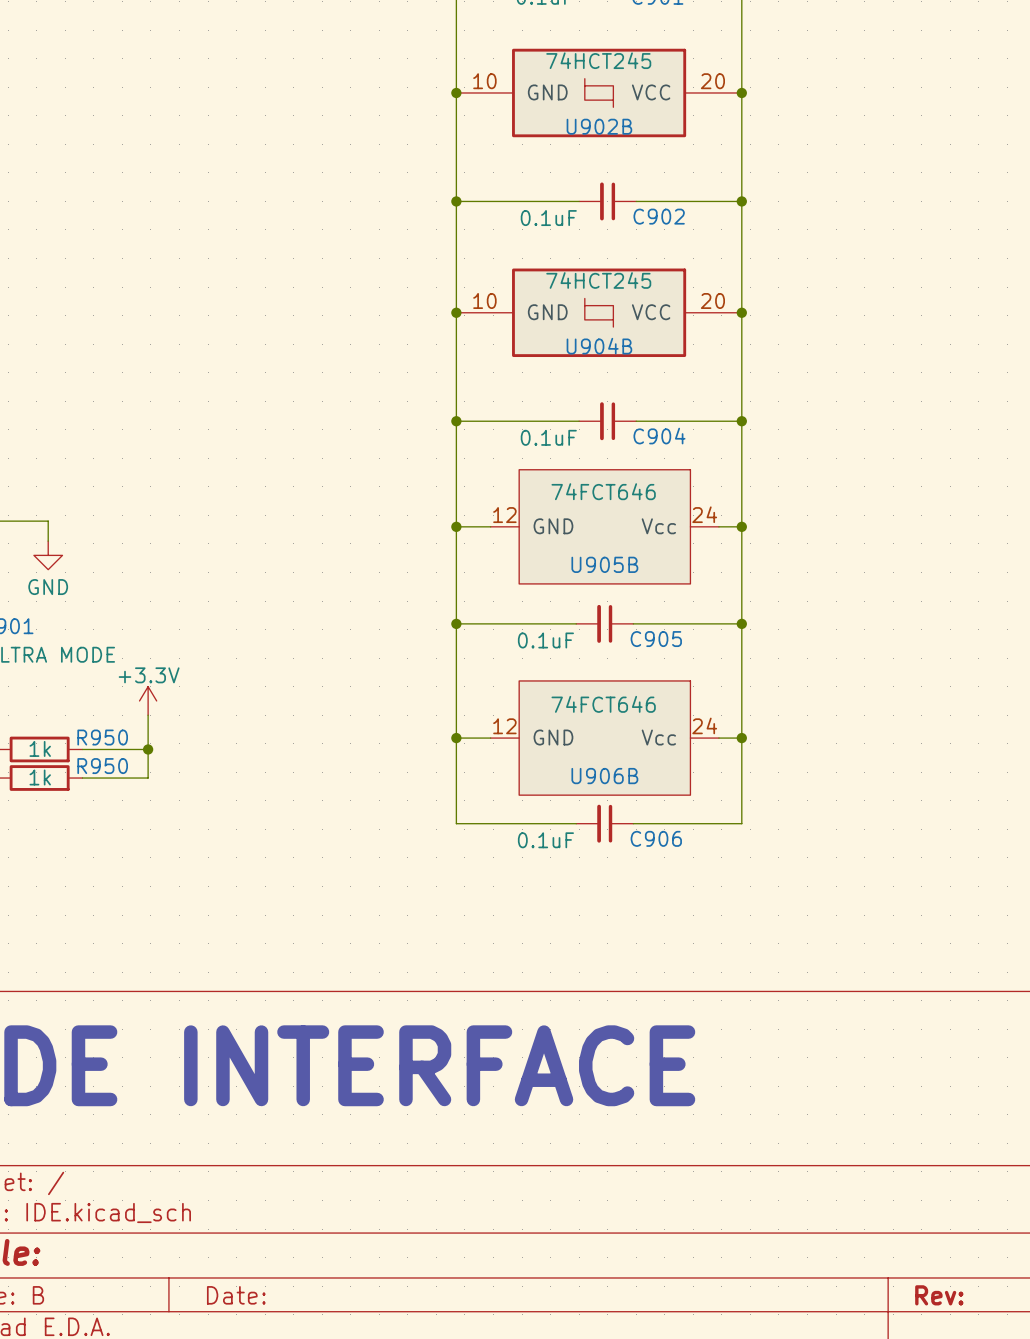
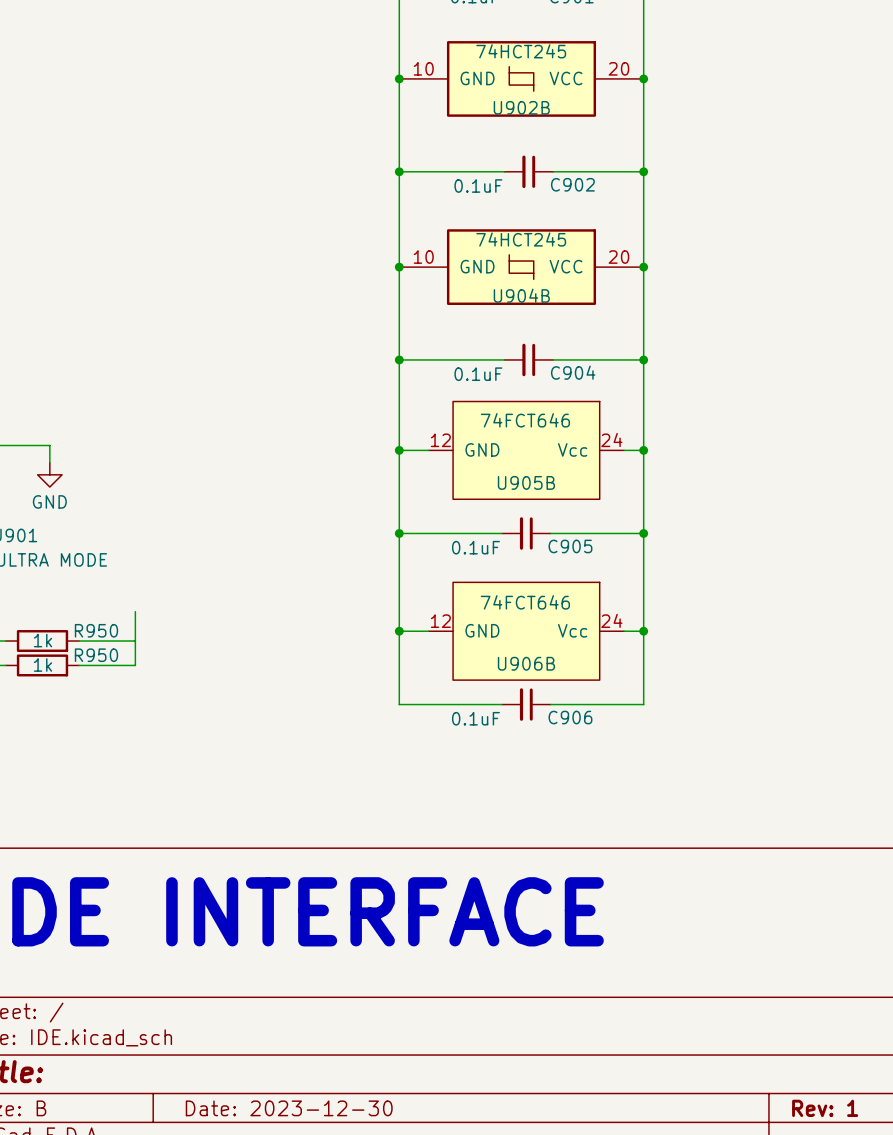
power symbol: +3.3V (148, 700) -> none
junction: (148, 749) -> none
title block: Date: (236, 1295) -> Date: 2023-12-30 (289, 1108)
title block: Rev: (939, 1295) -> Rev: 1 (825, 1108)

